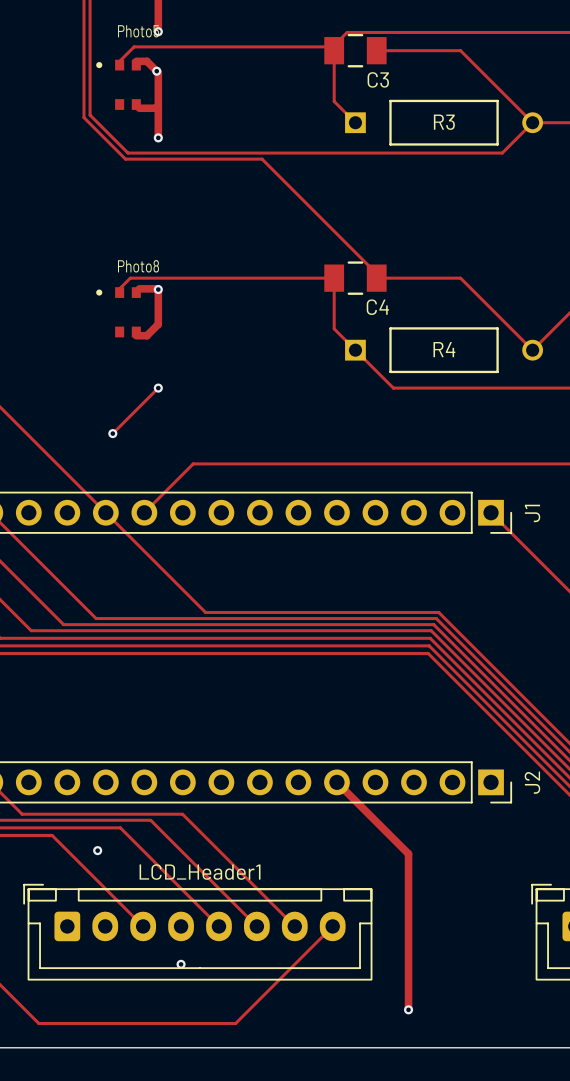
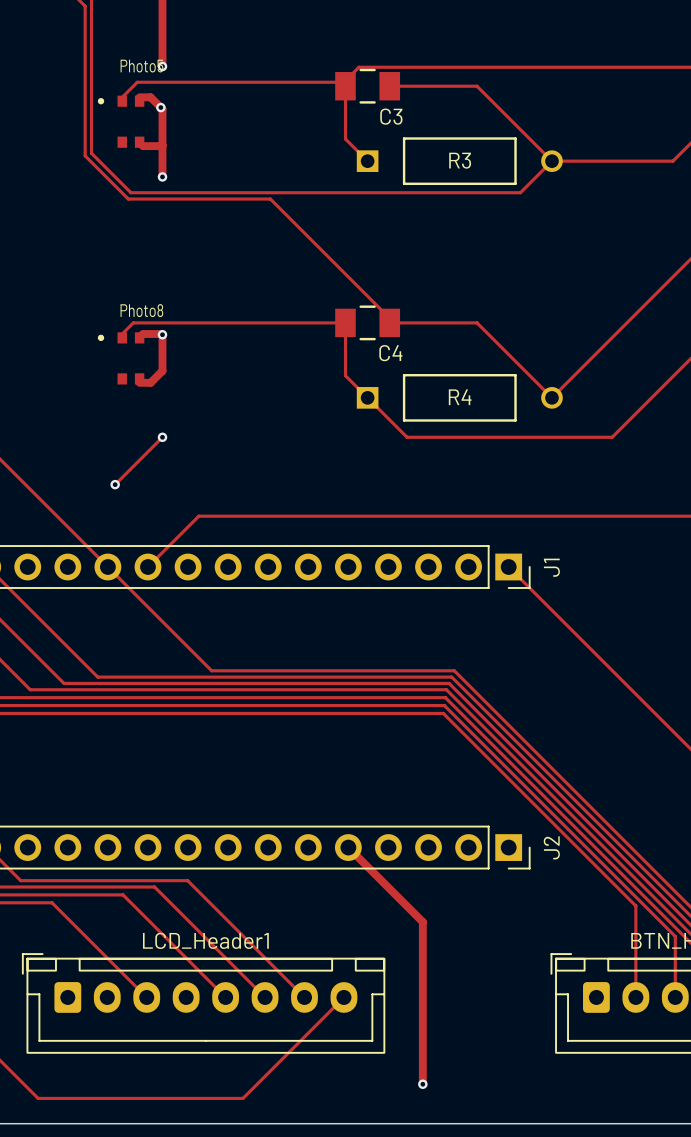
via: (97, 850) -> none
via: (181, 964) -> none

